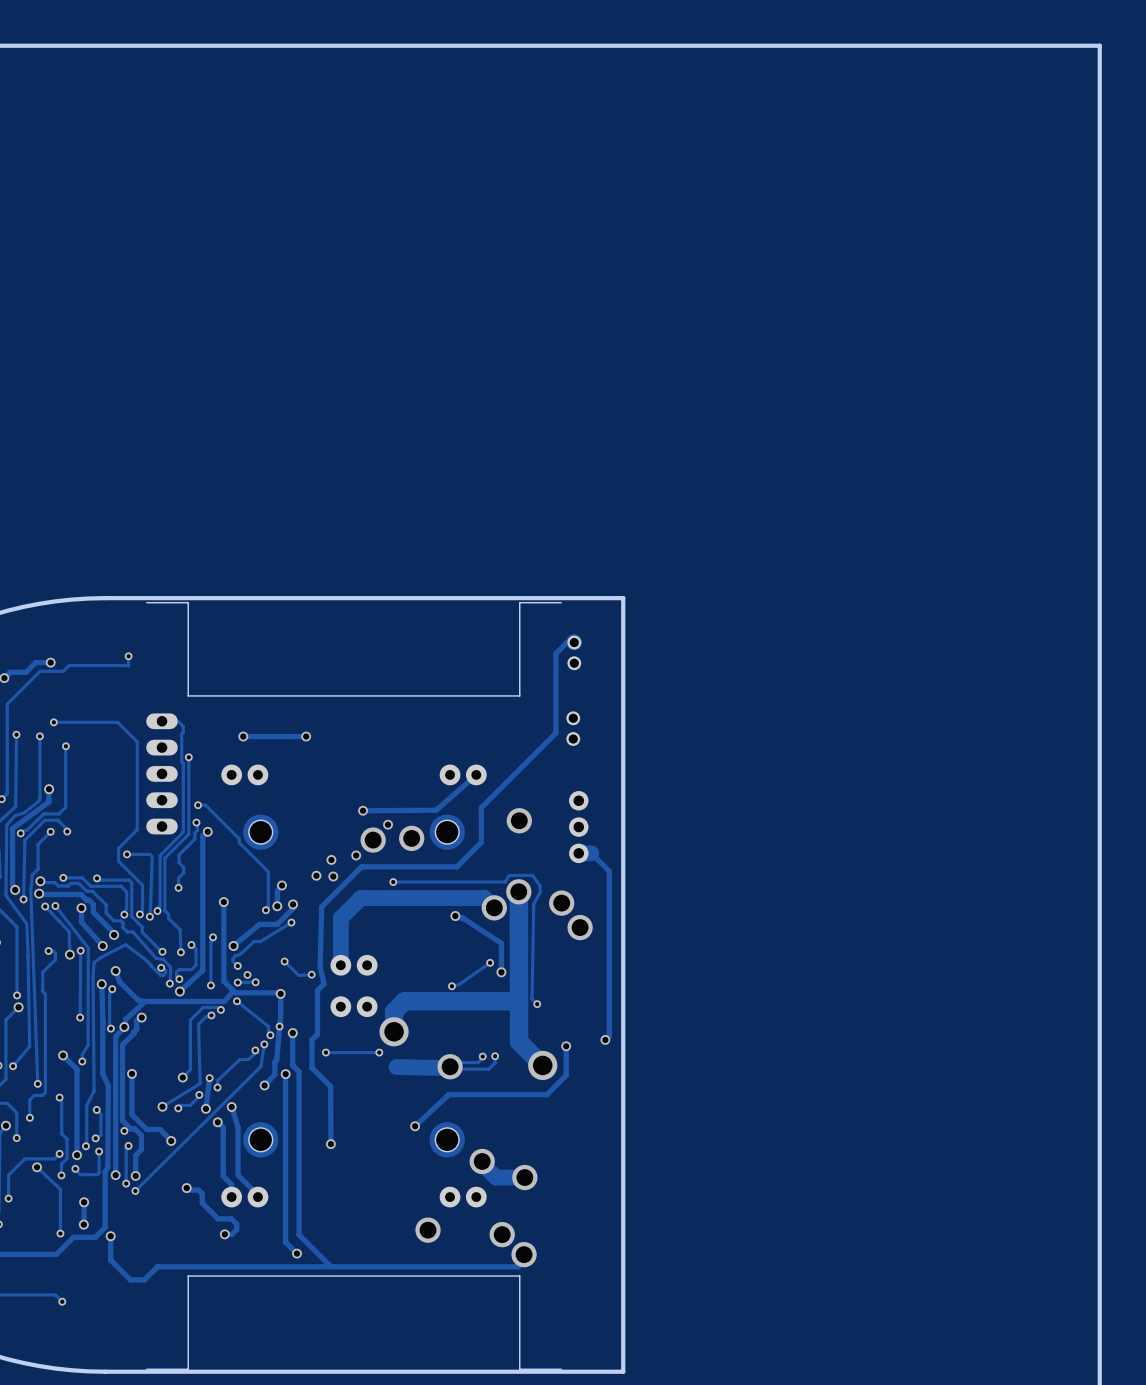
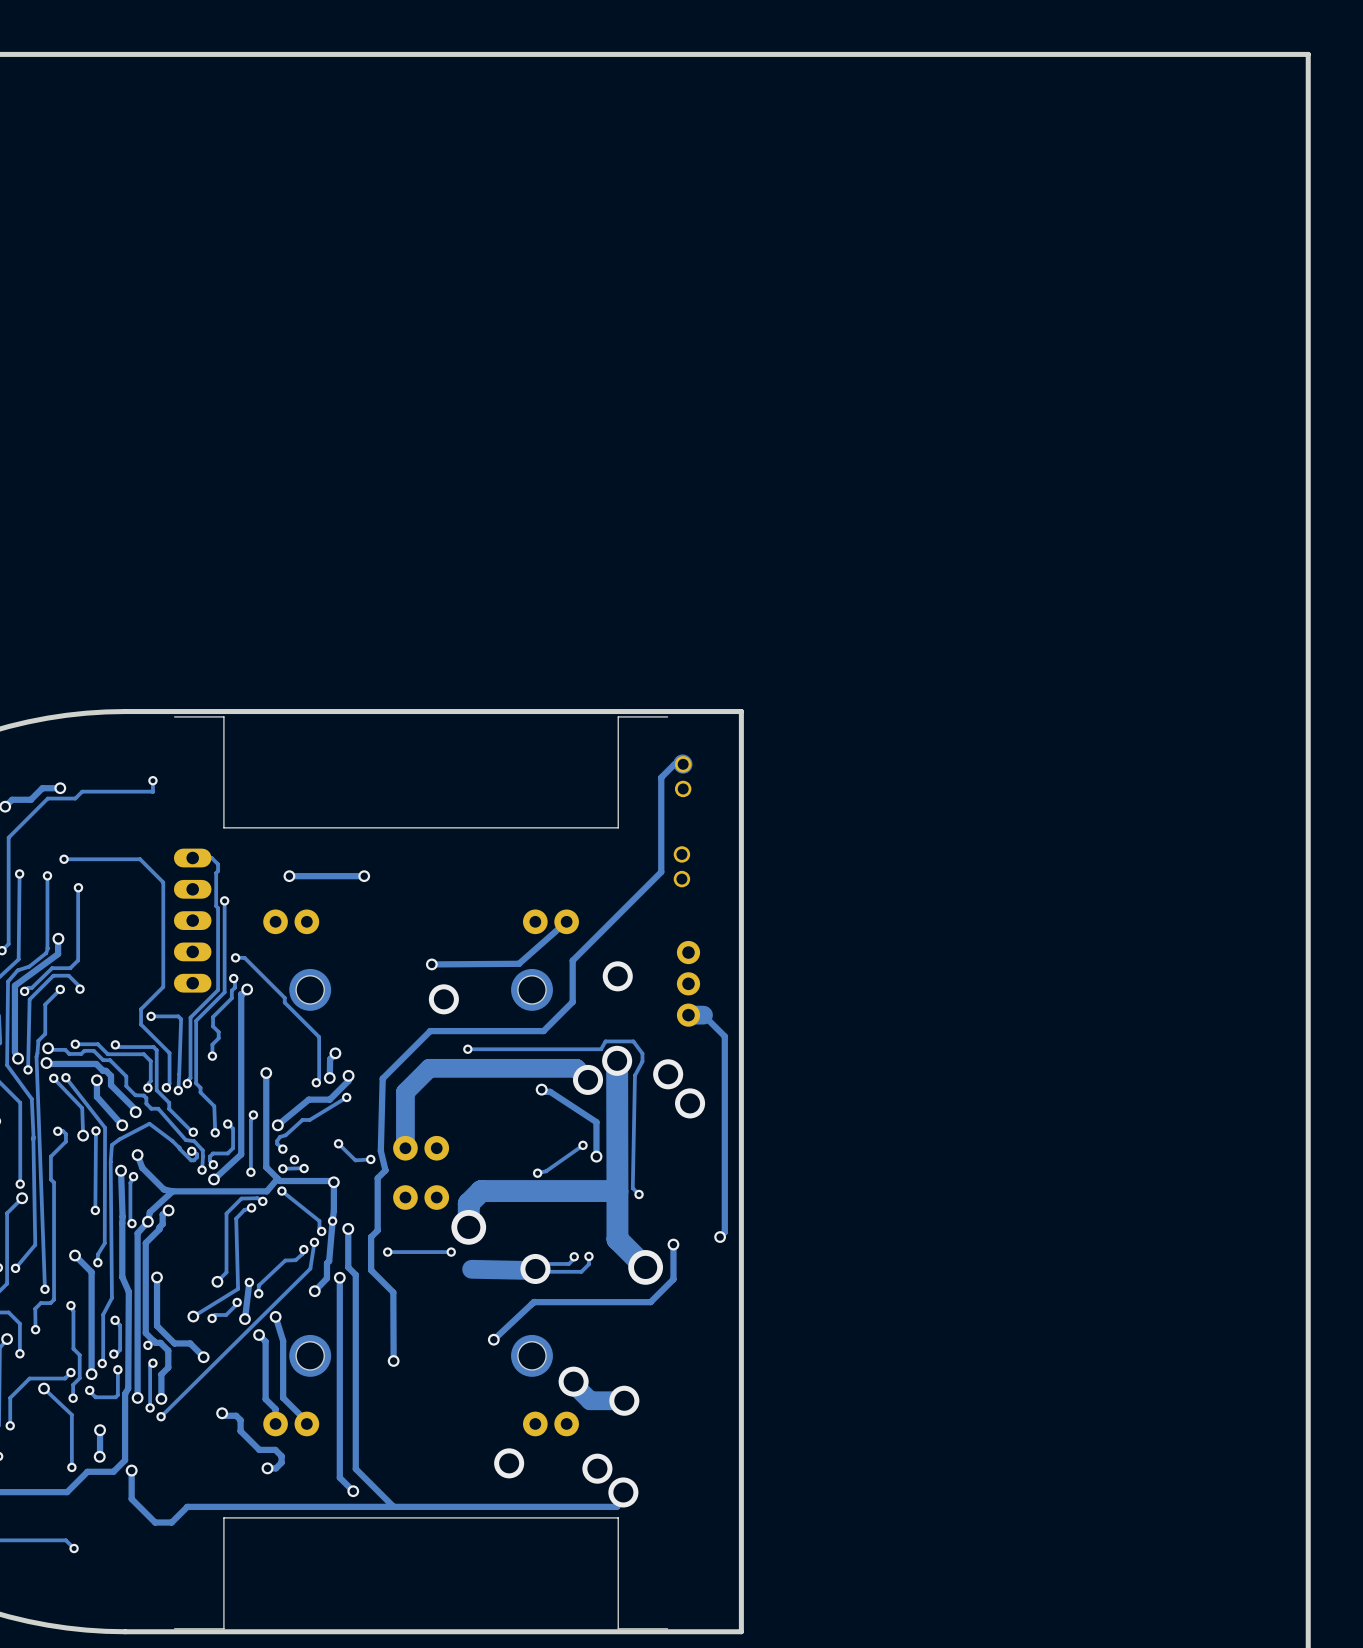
via: (388, 824) -> none
via: (411, 838) -> none
via: (356, 855) -> none
via: (331, 859) -> none
via: (316, 875) -> none
via: (333, 876) -> none

